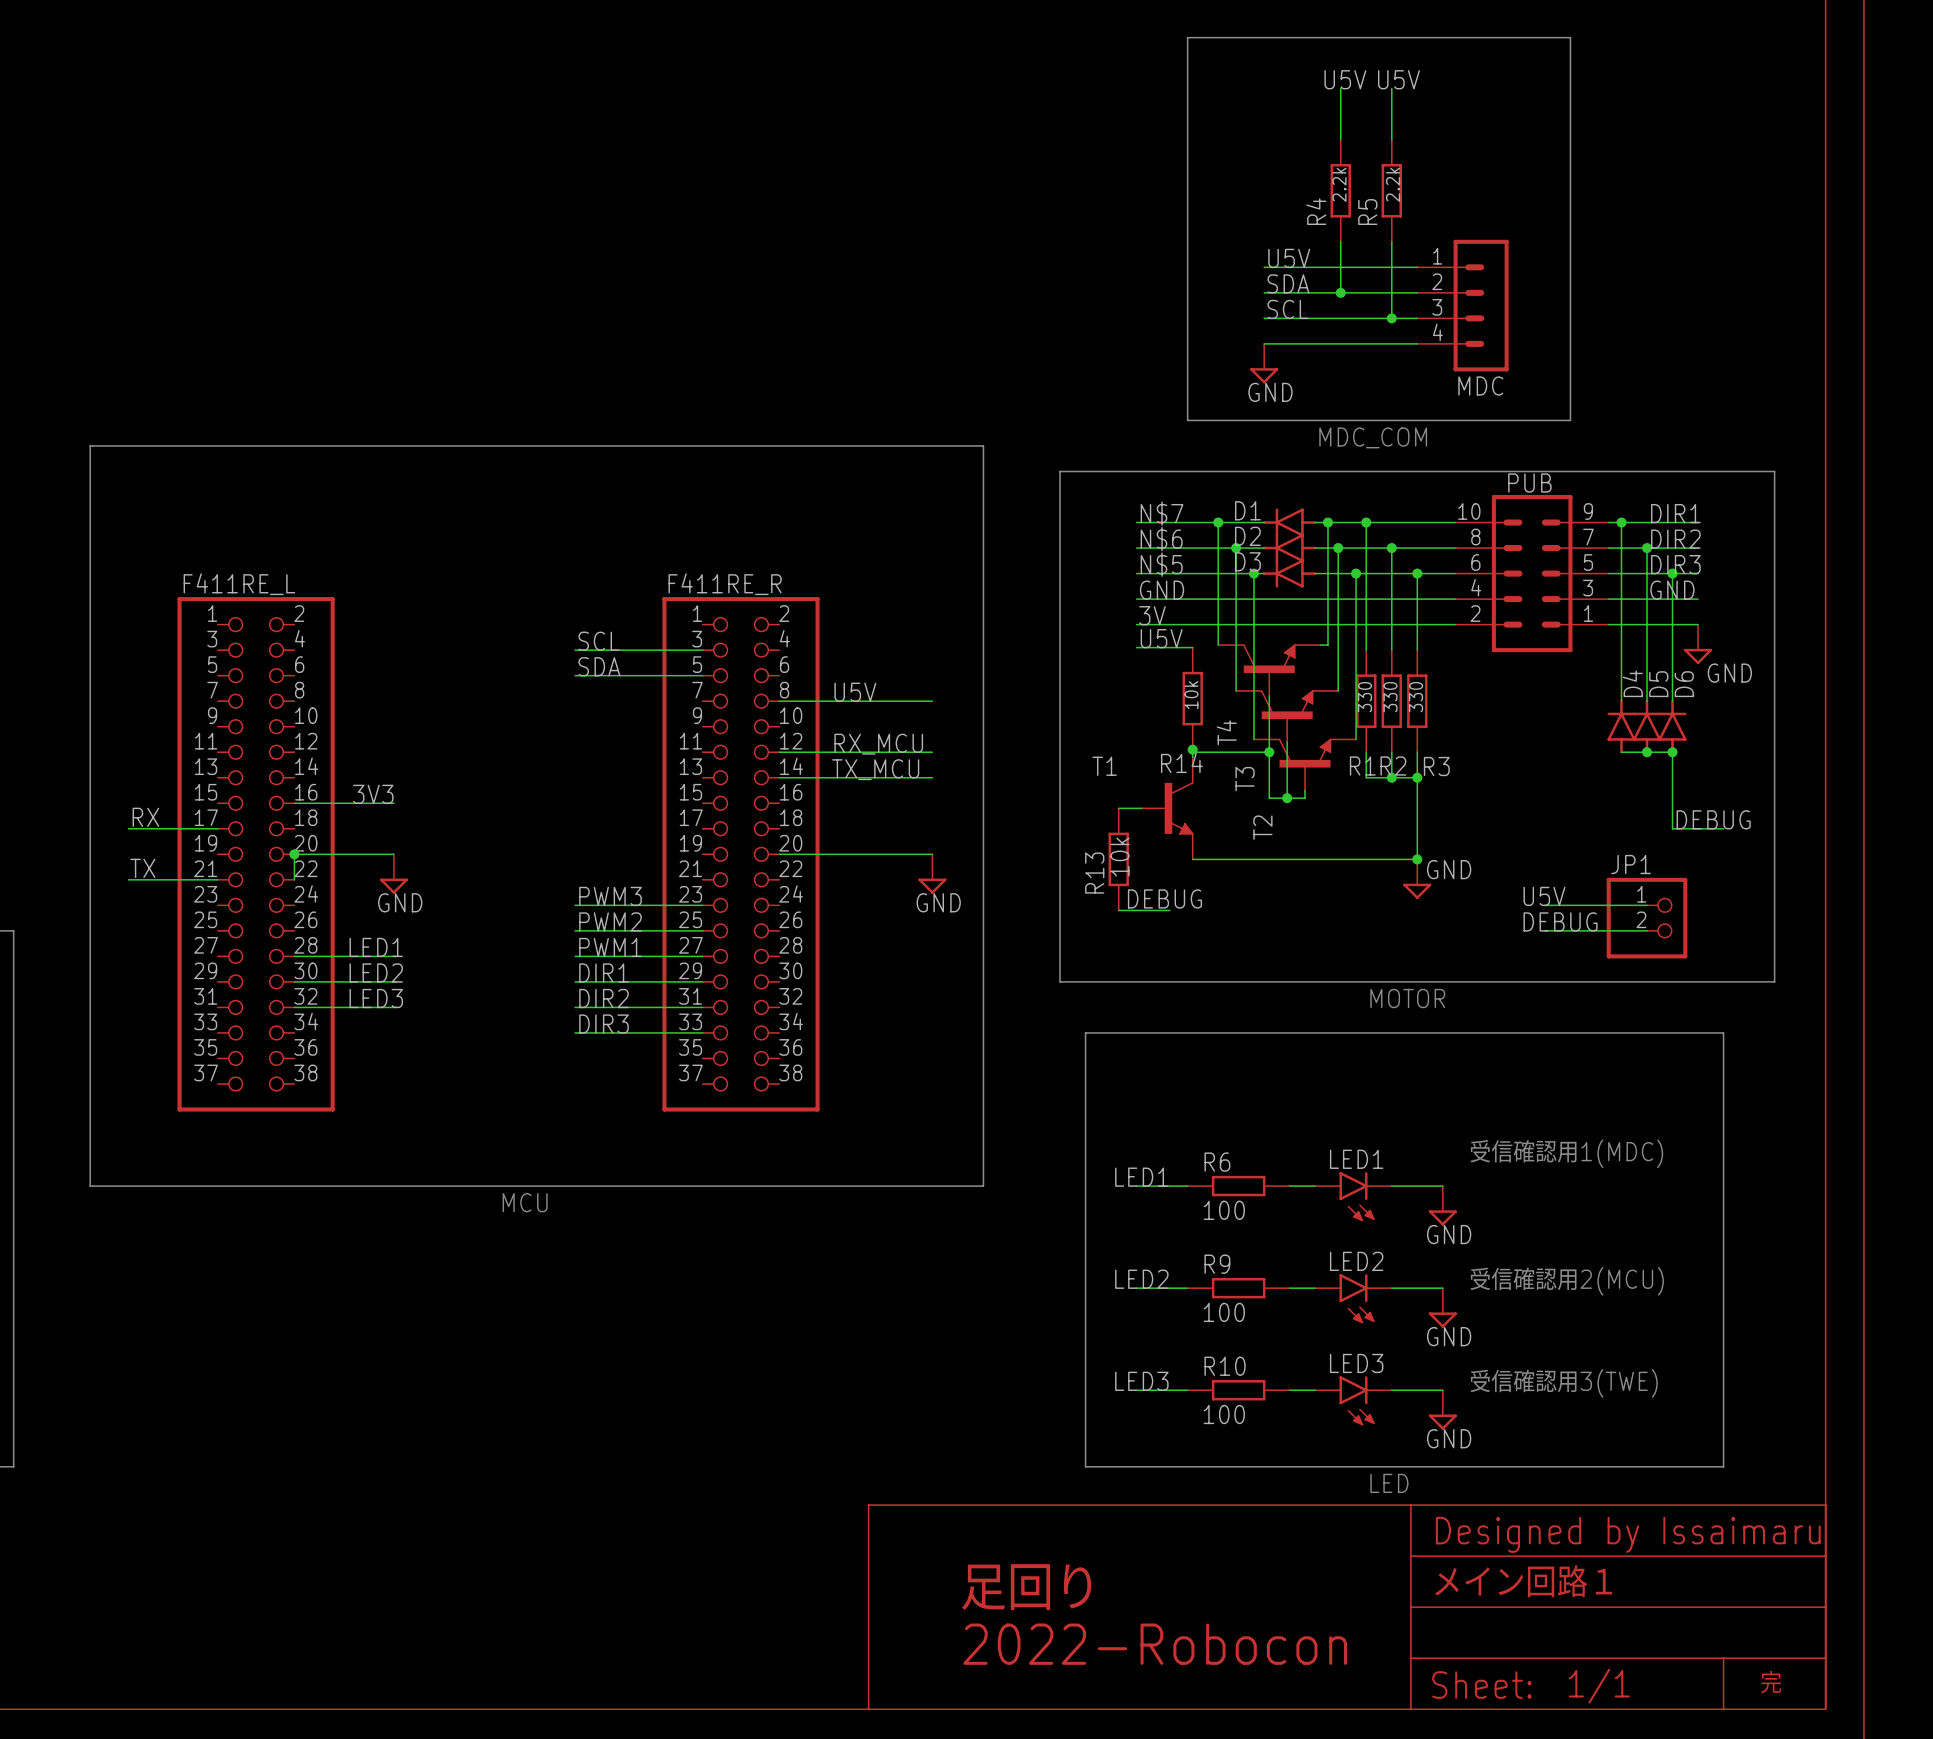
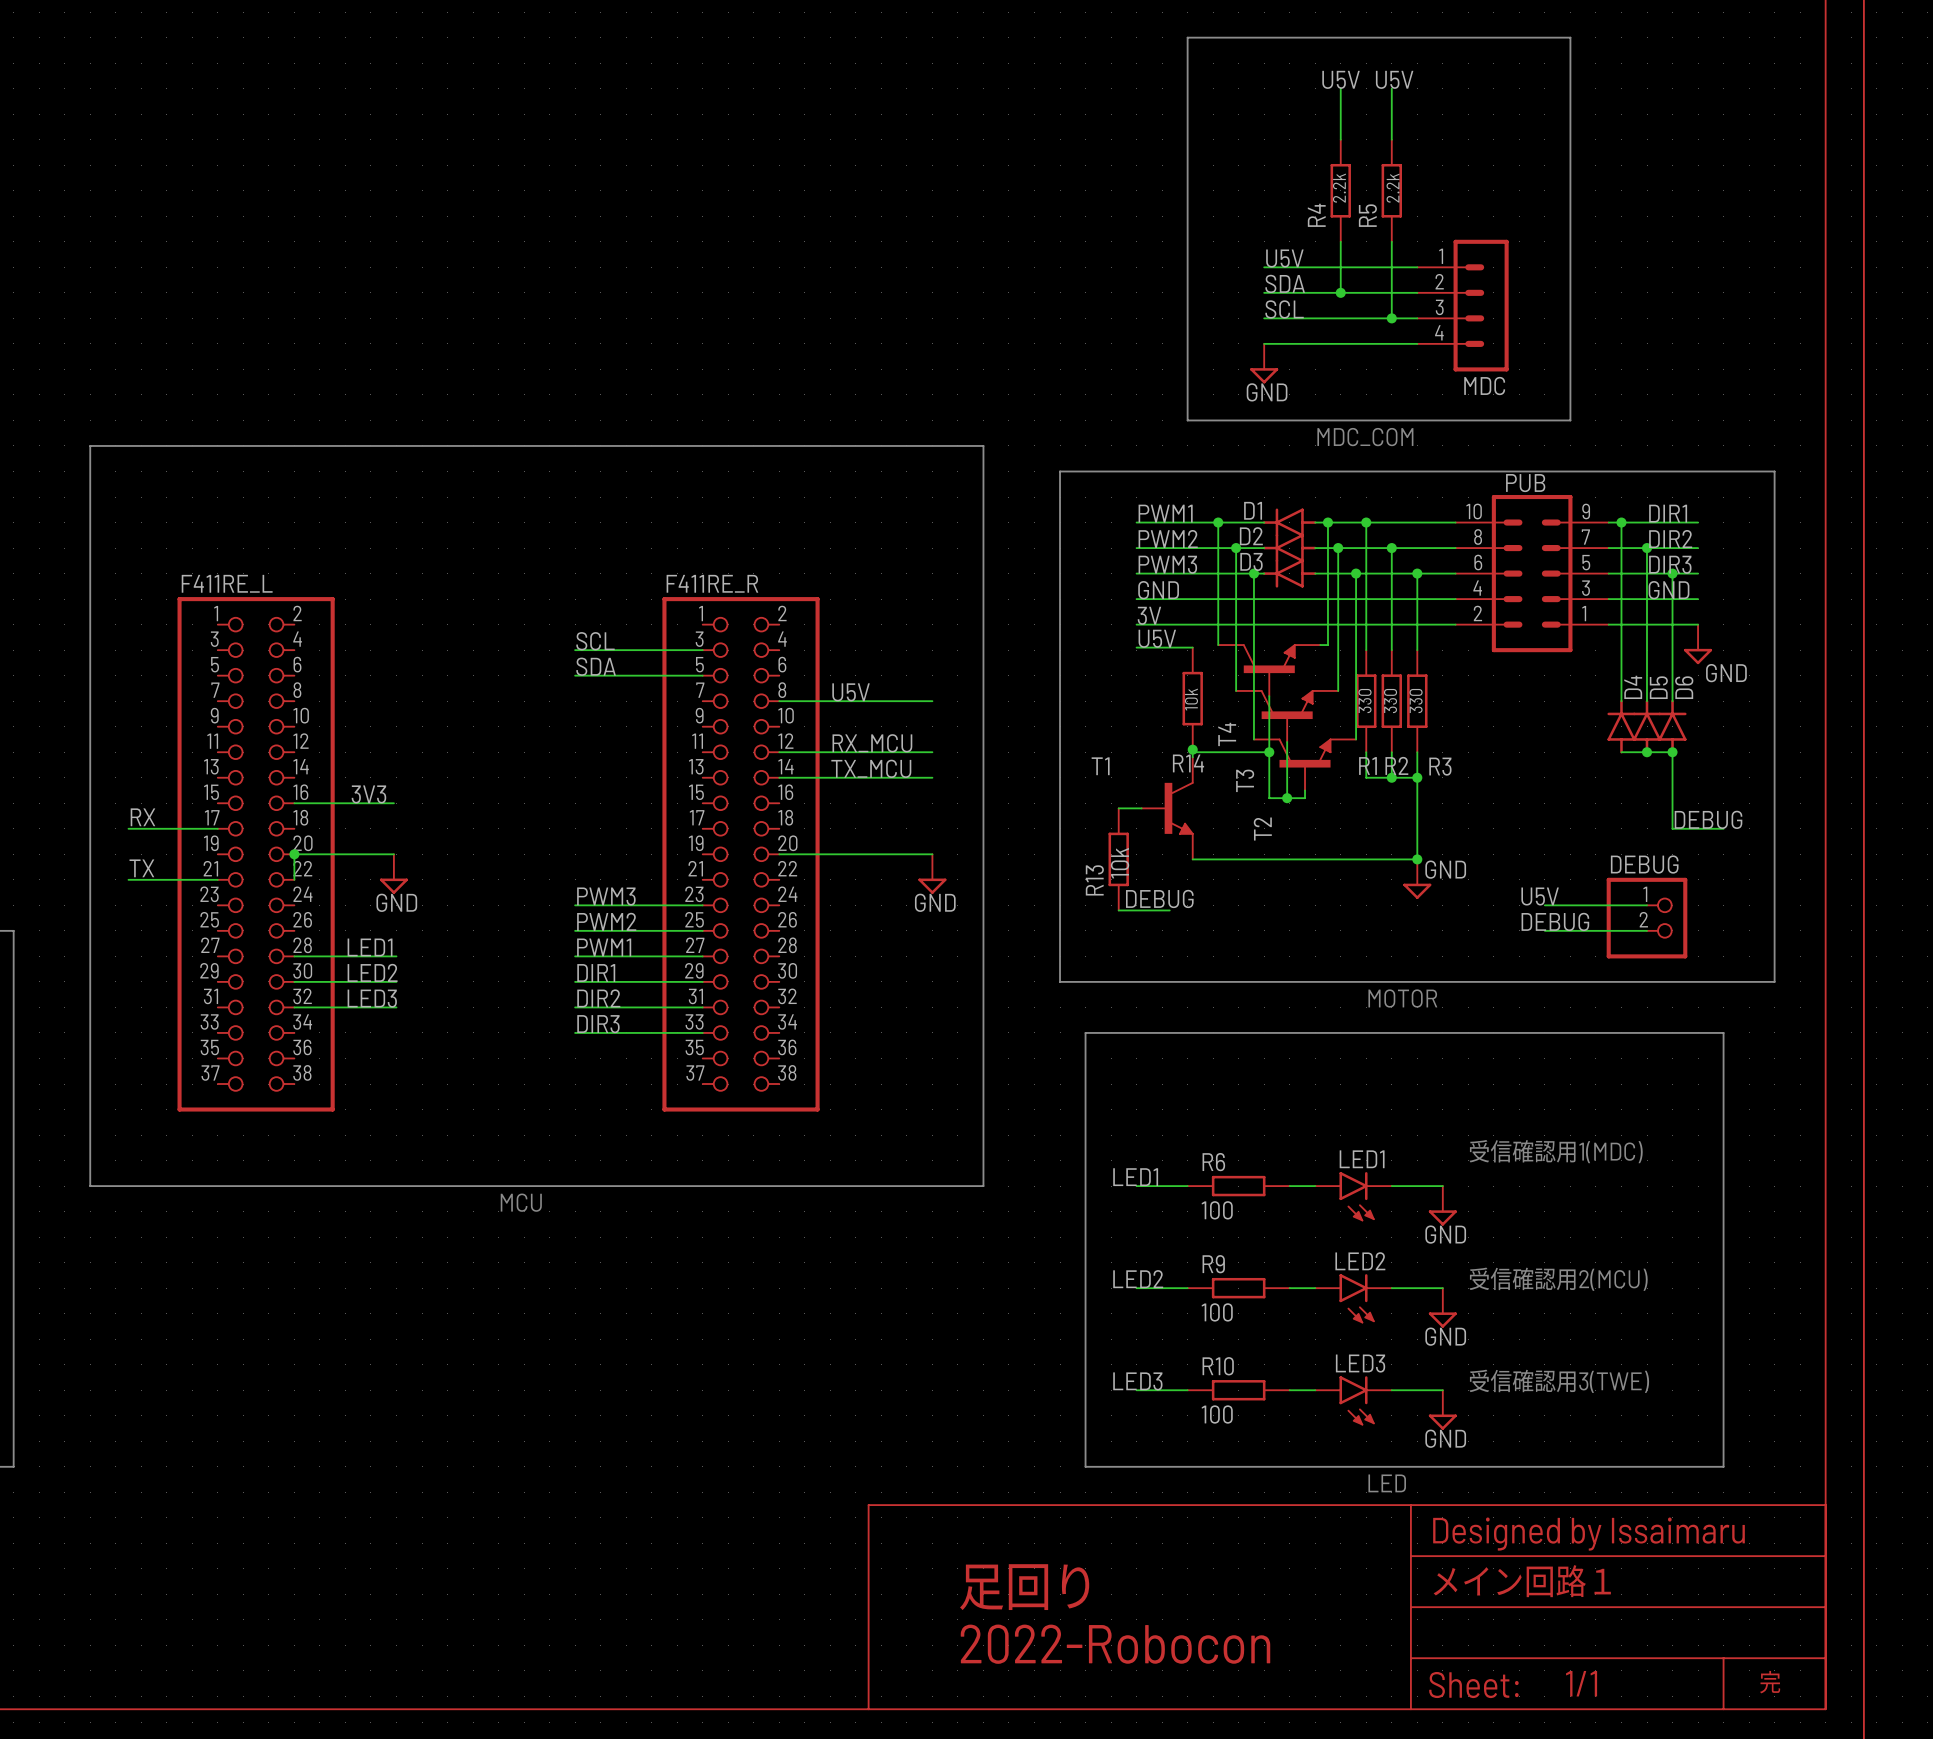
label: N$7 (1162, 513) -> PWM1 (1165, 513)
label: N$6 (1161, 539) -> PWM2 (1168, 539)
label: N$5 (1161, 564) -> PWM3 (1167, 564)
JP1 name: JP1 (1631, 864) -> DEBUG (1644, 864)

